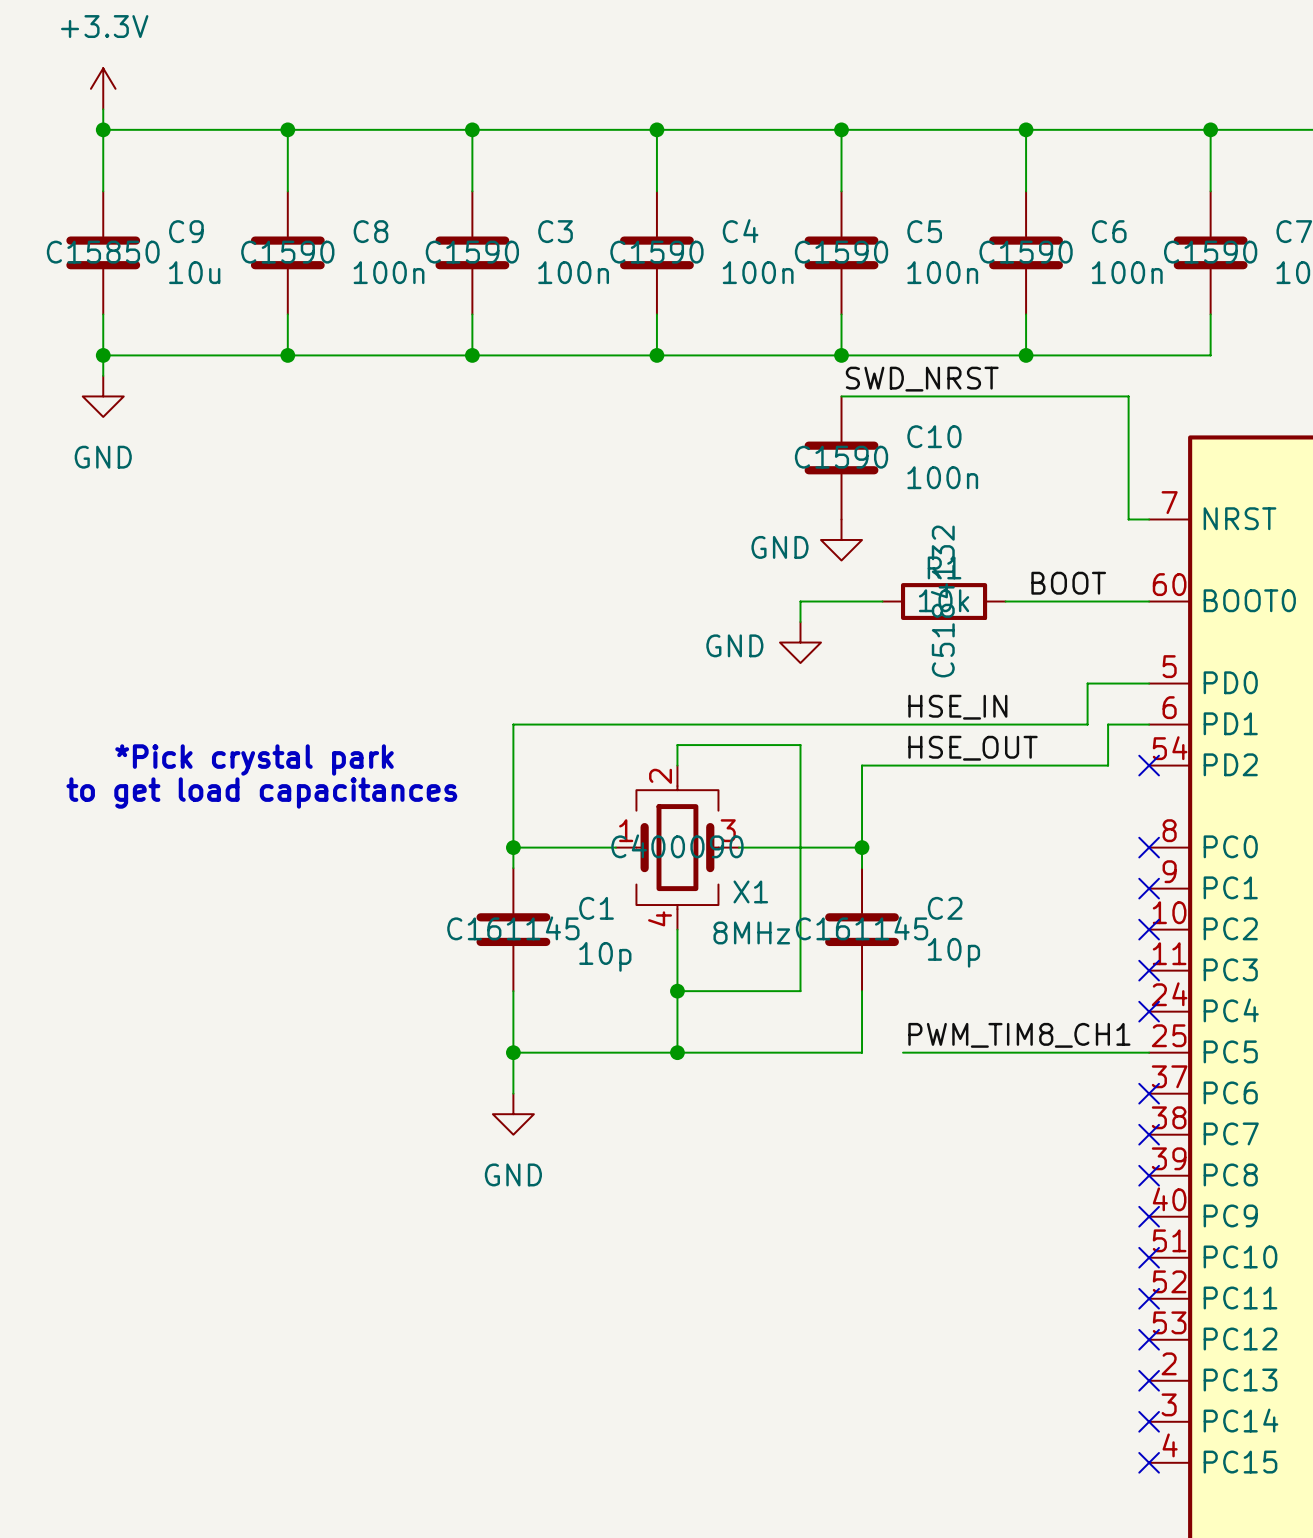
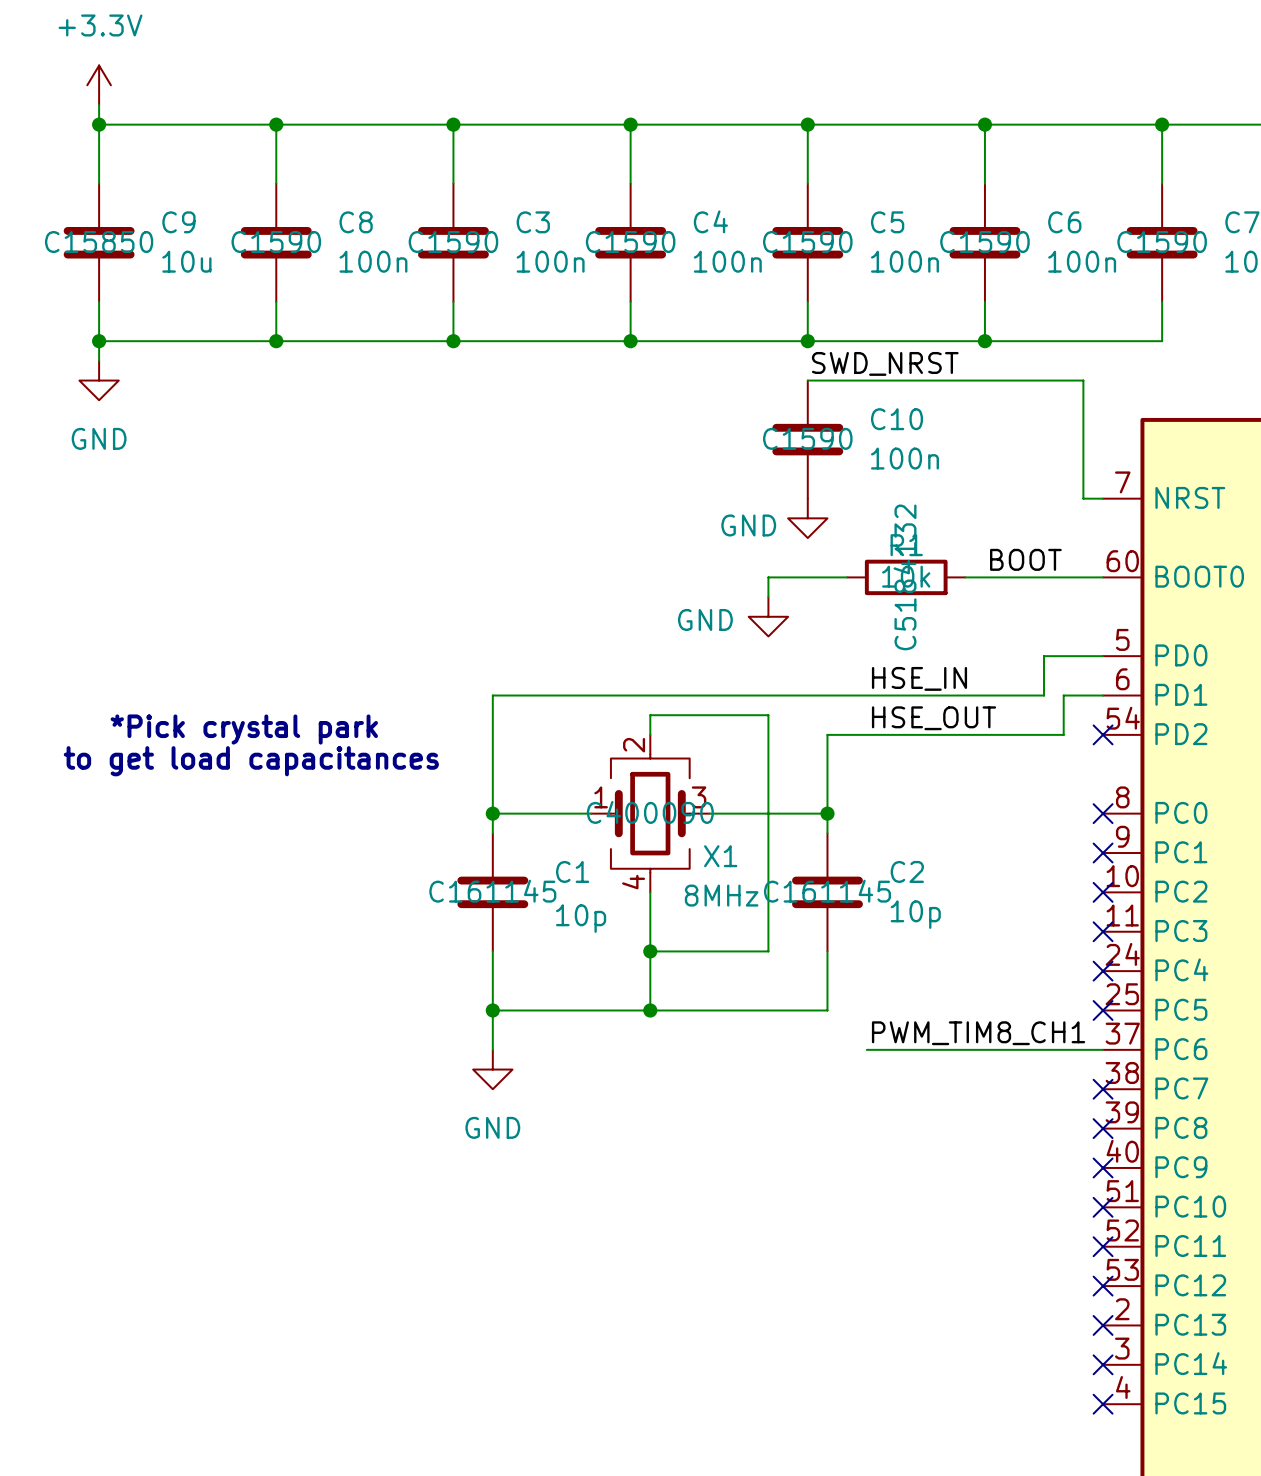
label position: PWM_TIM8_CH1 (1019, 1035) -> PWM_TIM8_CH1 (978, 1033)
wire: (903, 1052) (1149, 1052) -> (866, 1049) (1103, 1049)
no-connect mark position: (1149, 1093) -> (1103, 1010)

